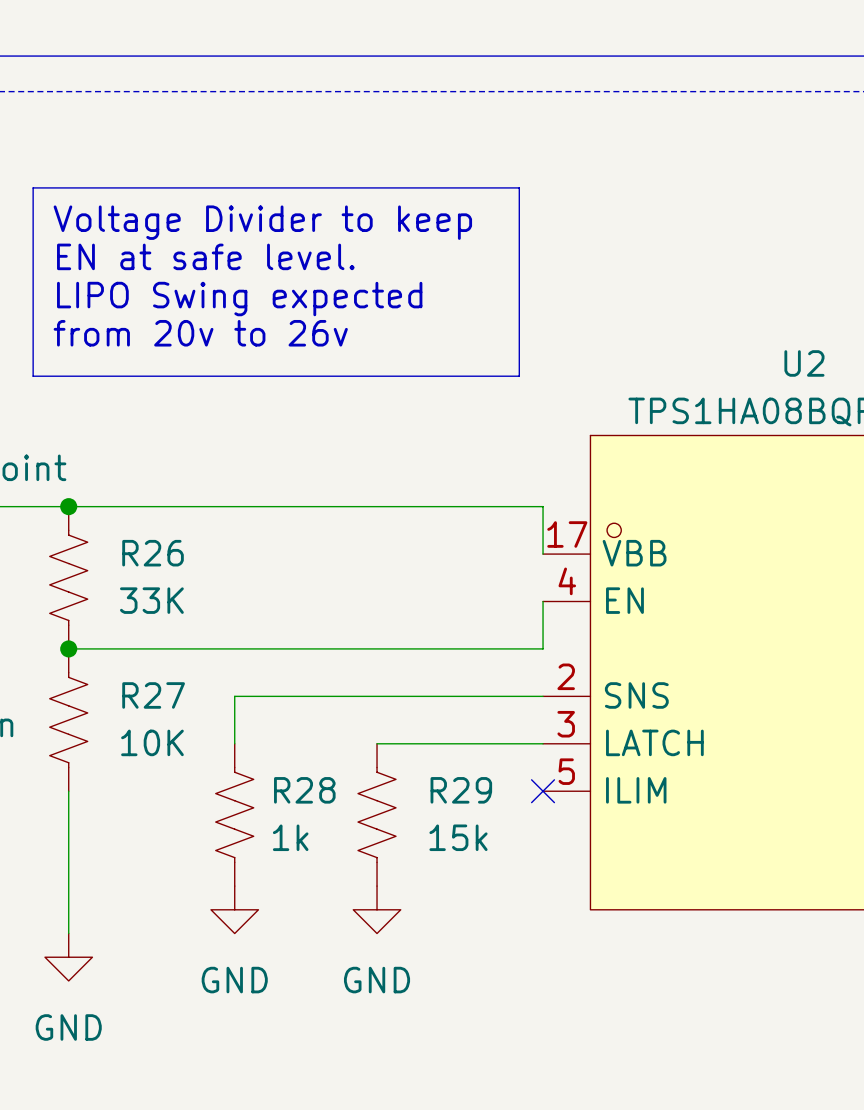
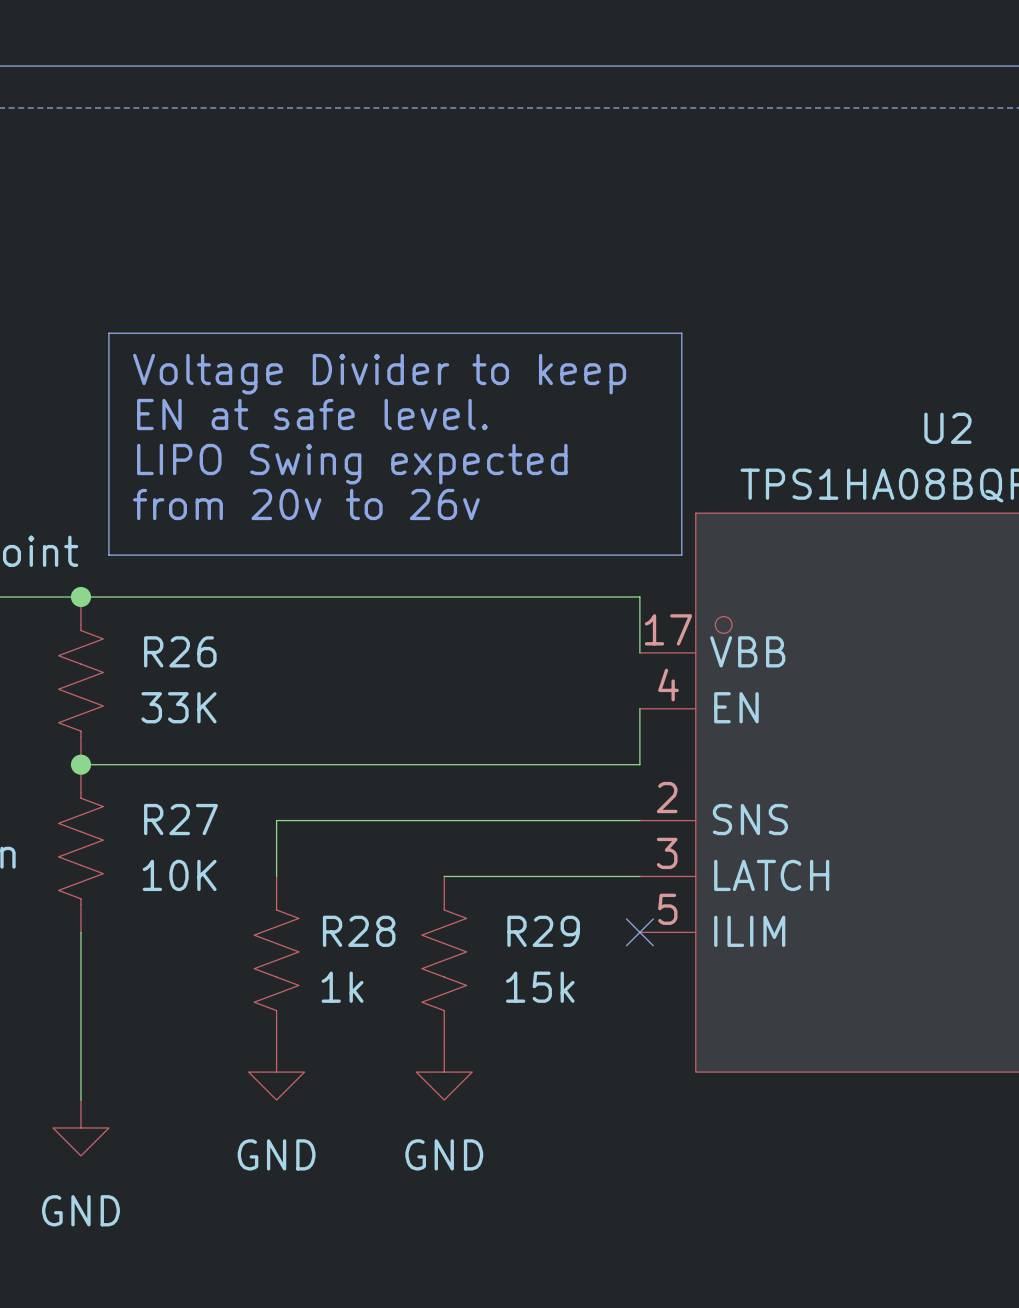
line: (33, 187) (519, 187) (519, 376) (33, 376) (33, 187) -> (108, 333) (681, 333) (681, 555) (108, 555) (108, 333)
text position: Voltage Divider to keep (262, 222) -> Voltage Divider to keep (379, 374)
text position: EN at safe level. (205, 256) -> EN at safe level. (312, 414)
text position: LIPO Swing expected (239, 299) -> LIPO Swing expected (352, 464)
text position: from 20v to 26v (200, 333) -> from 20v to 26v (306, 504)

